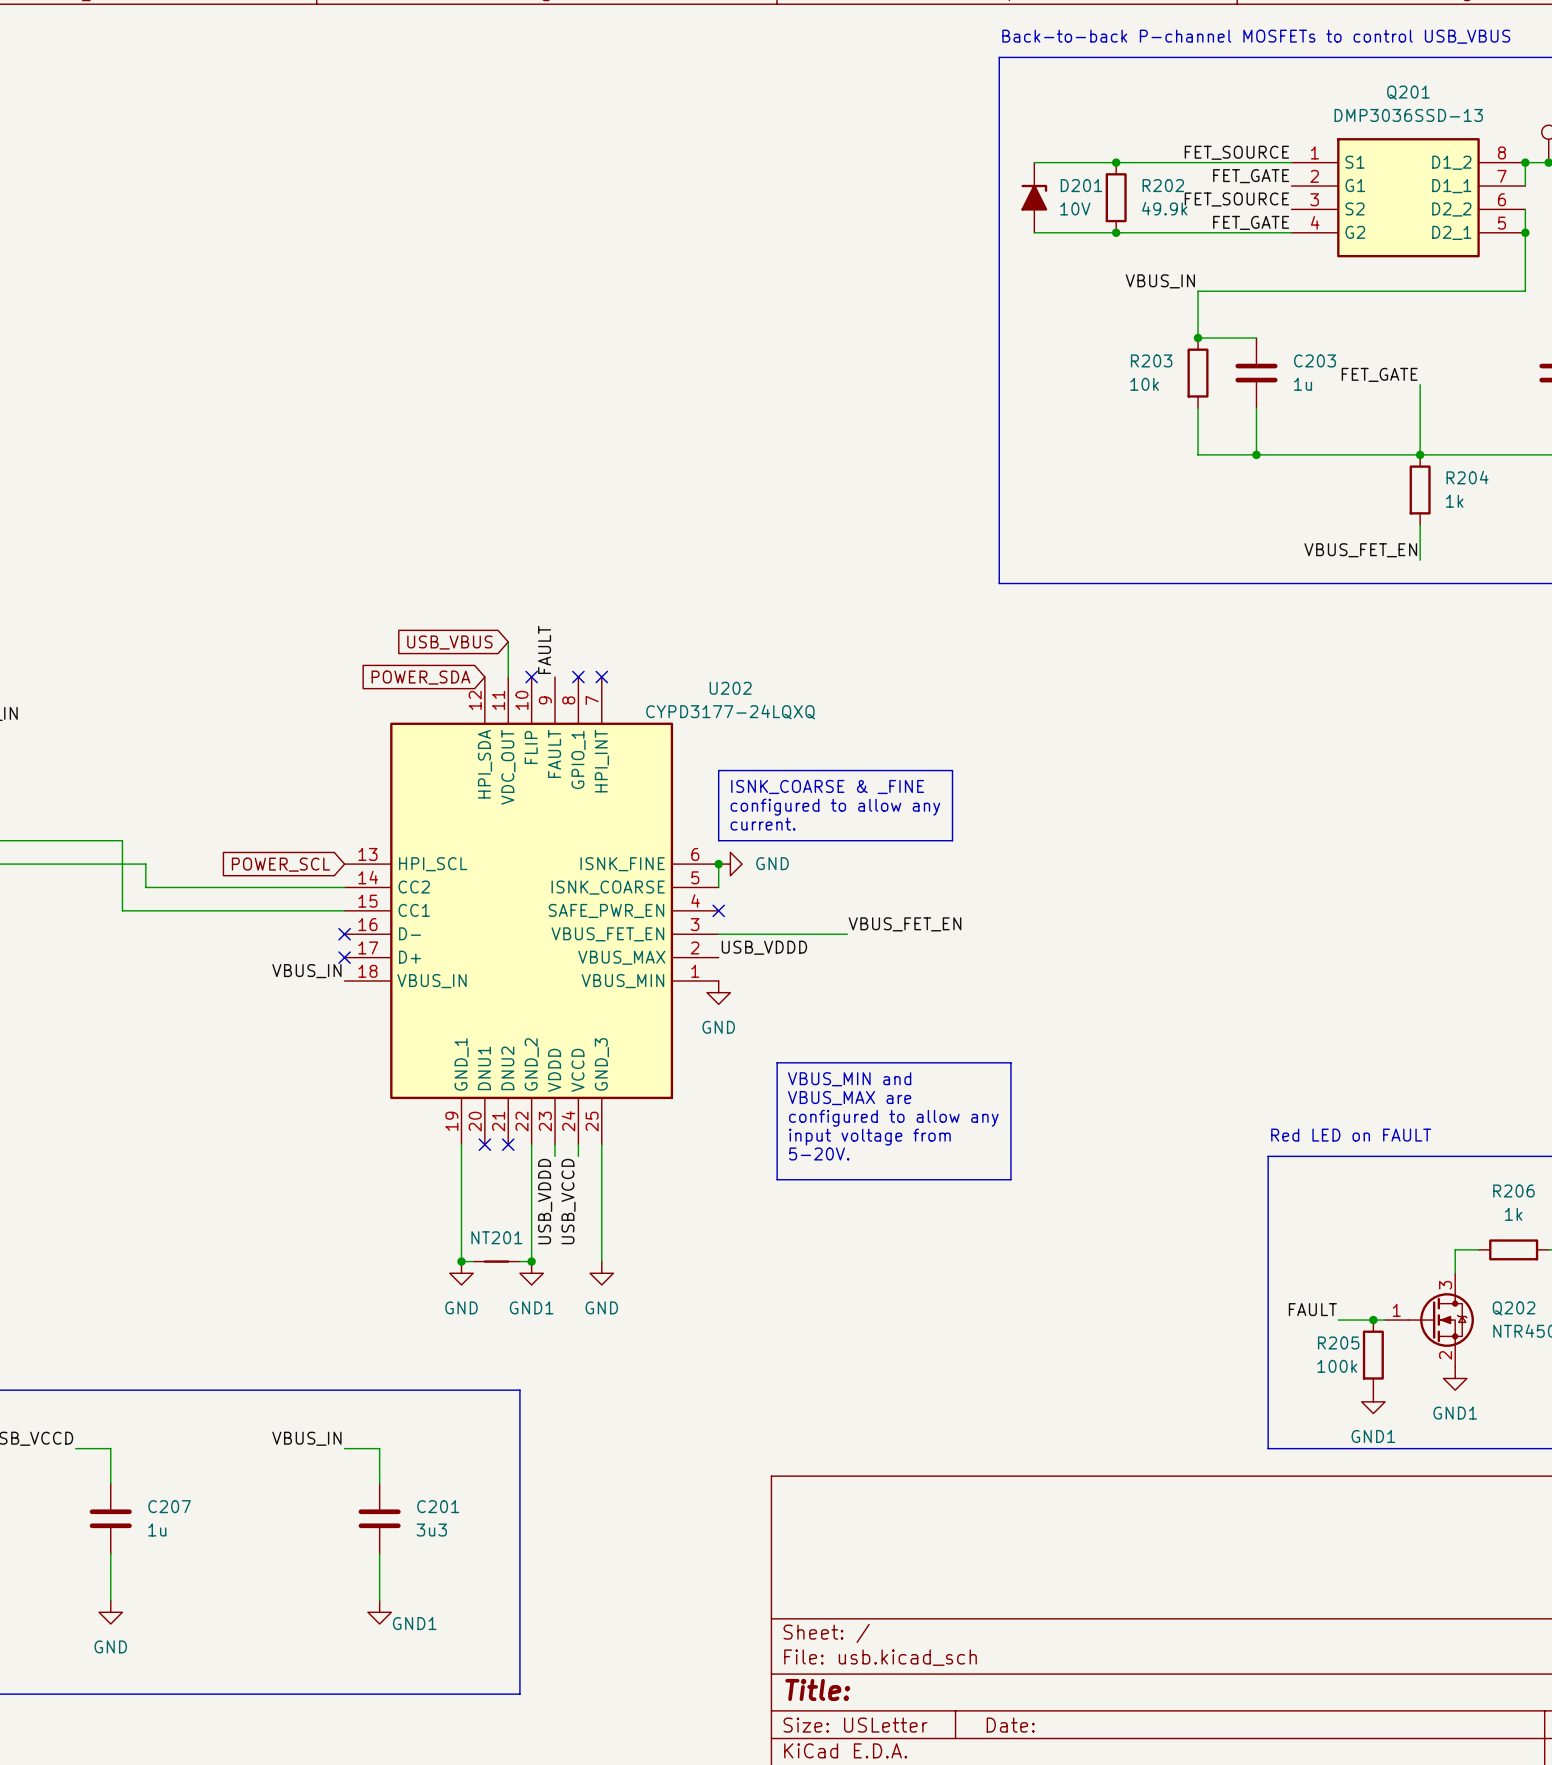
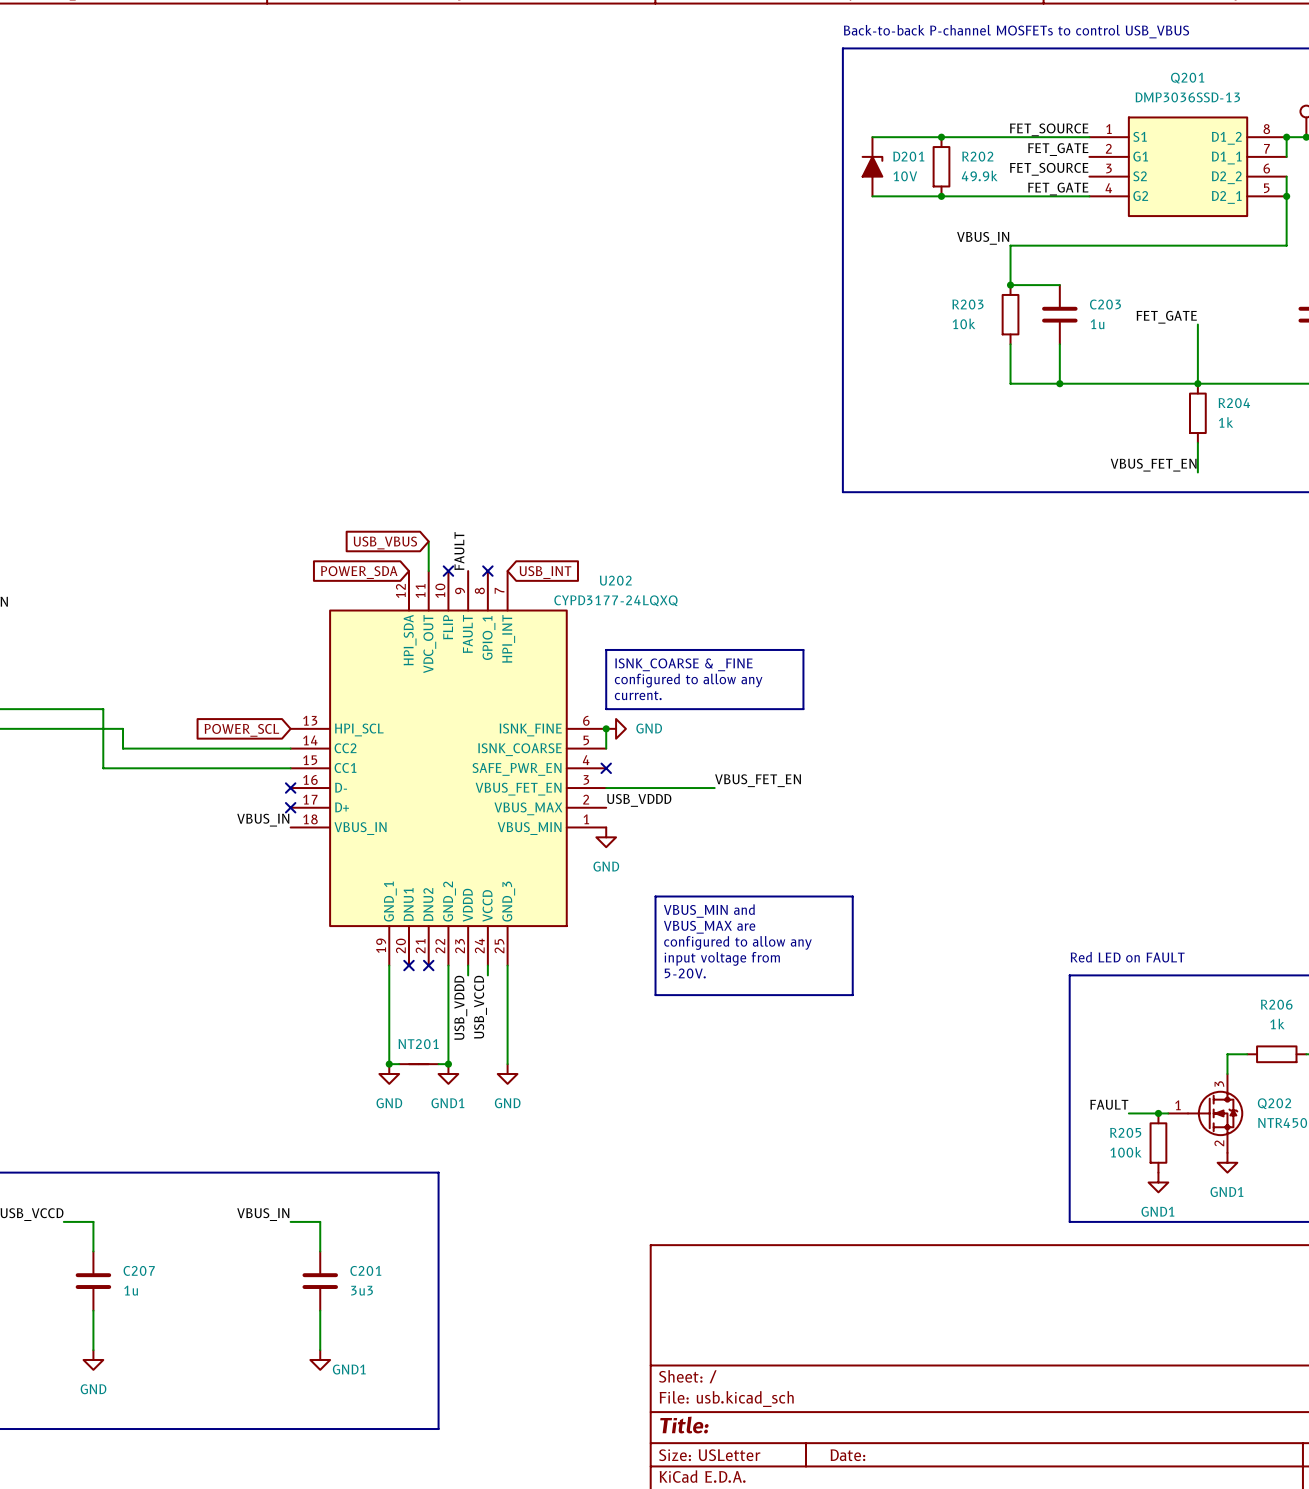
no-connect mark: (601, 677) -> none
global label: none -> USB_INT (545, 572)

